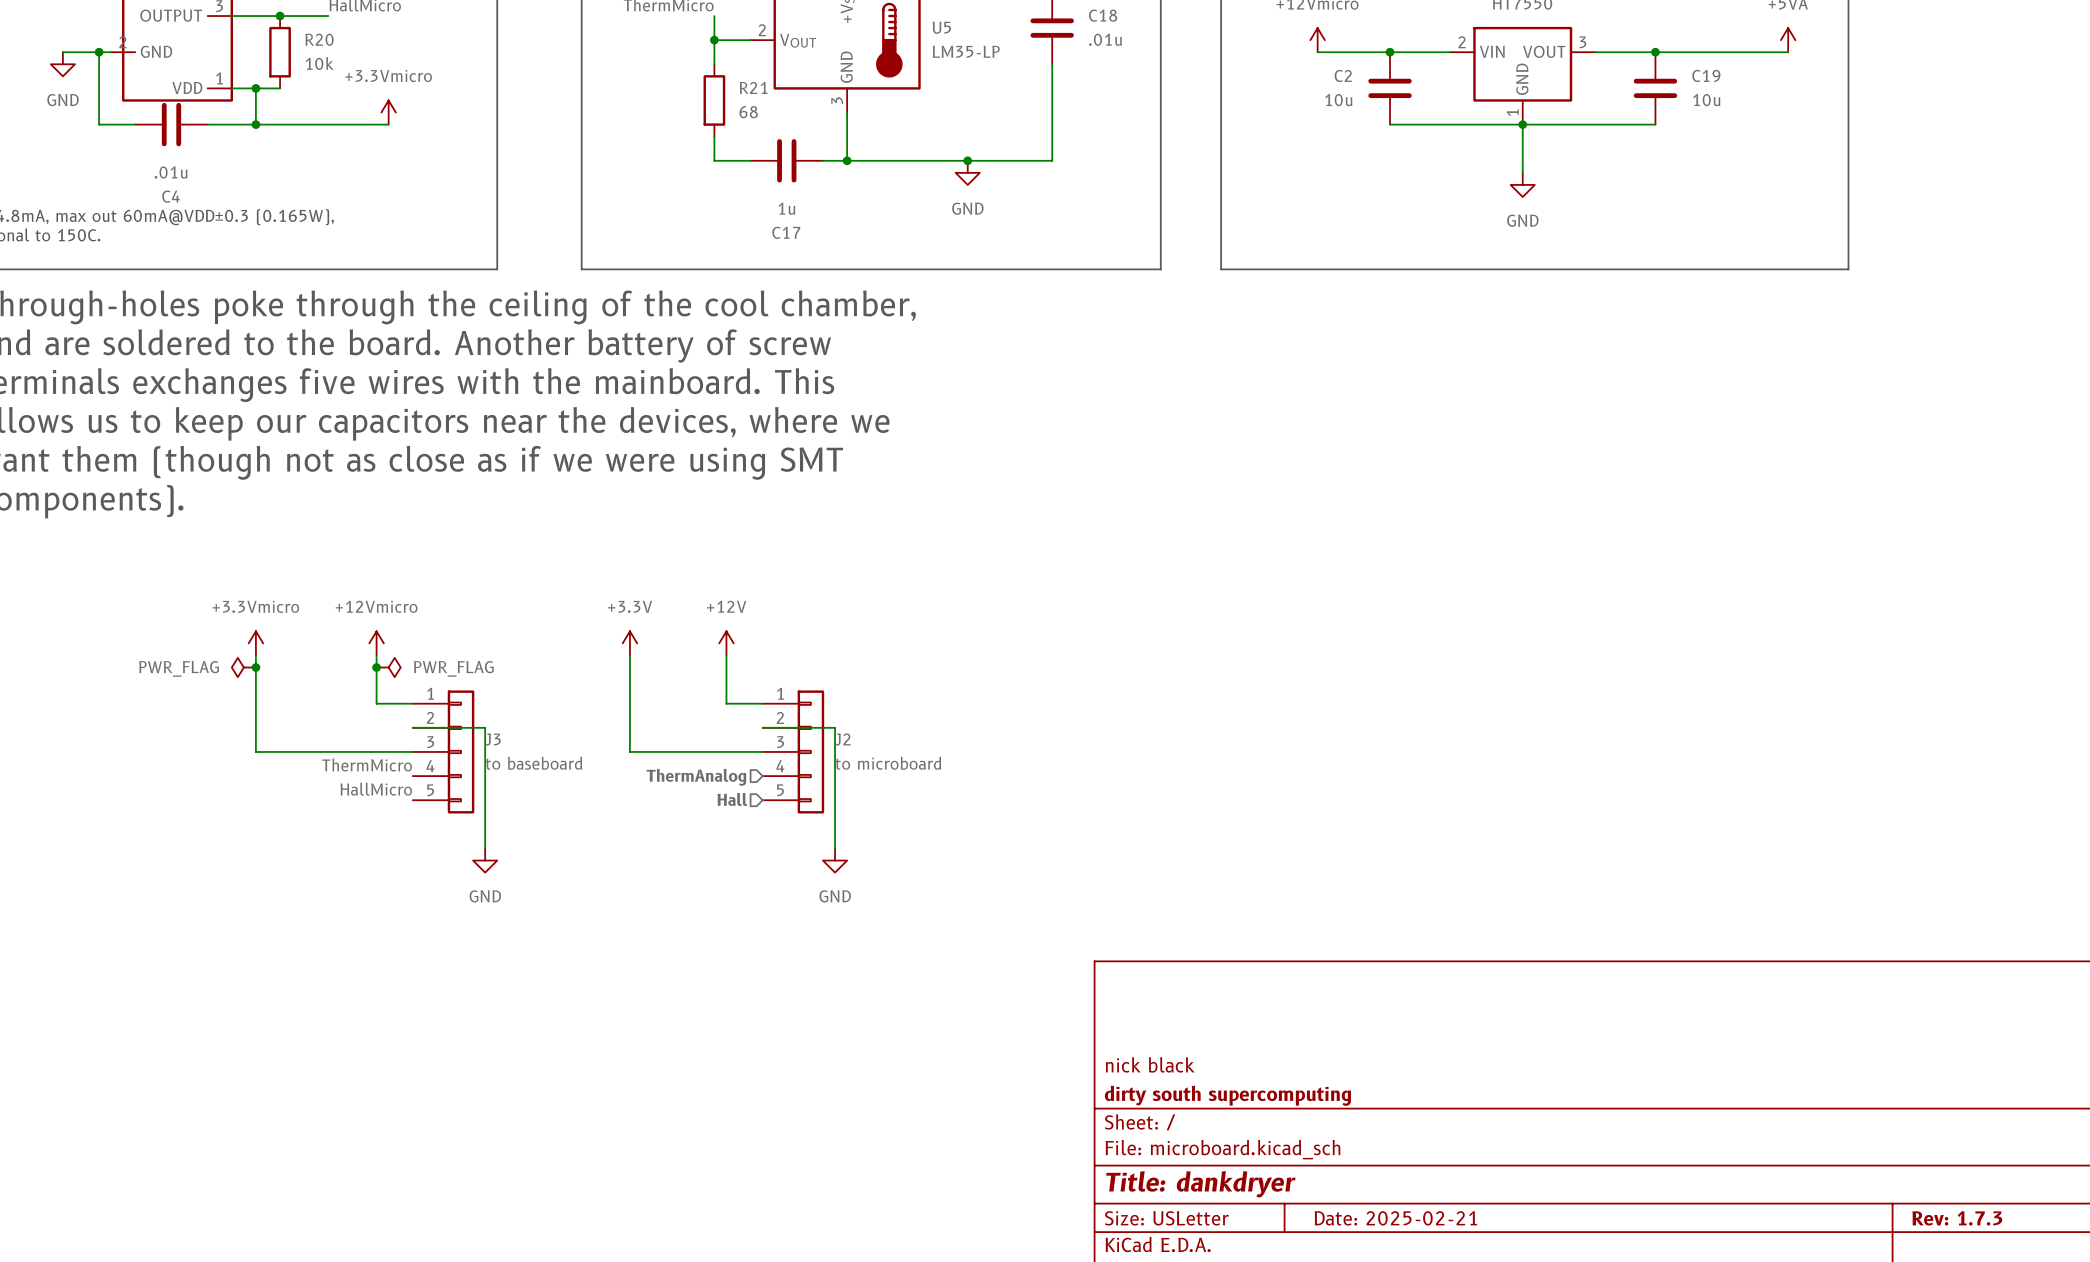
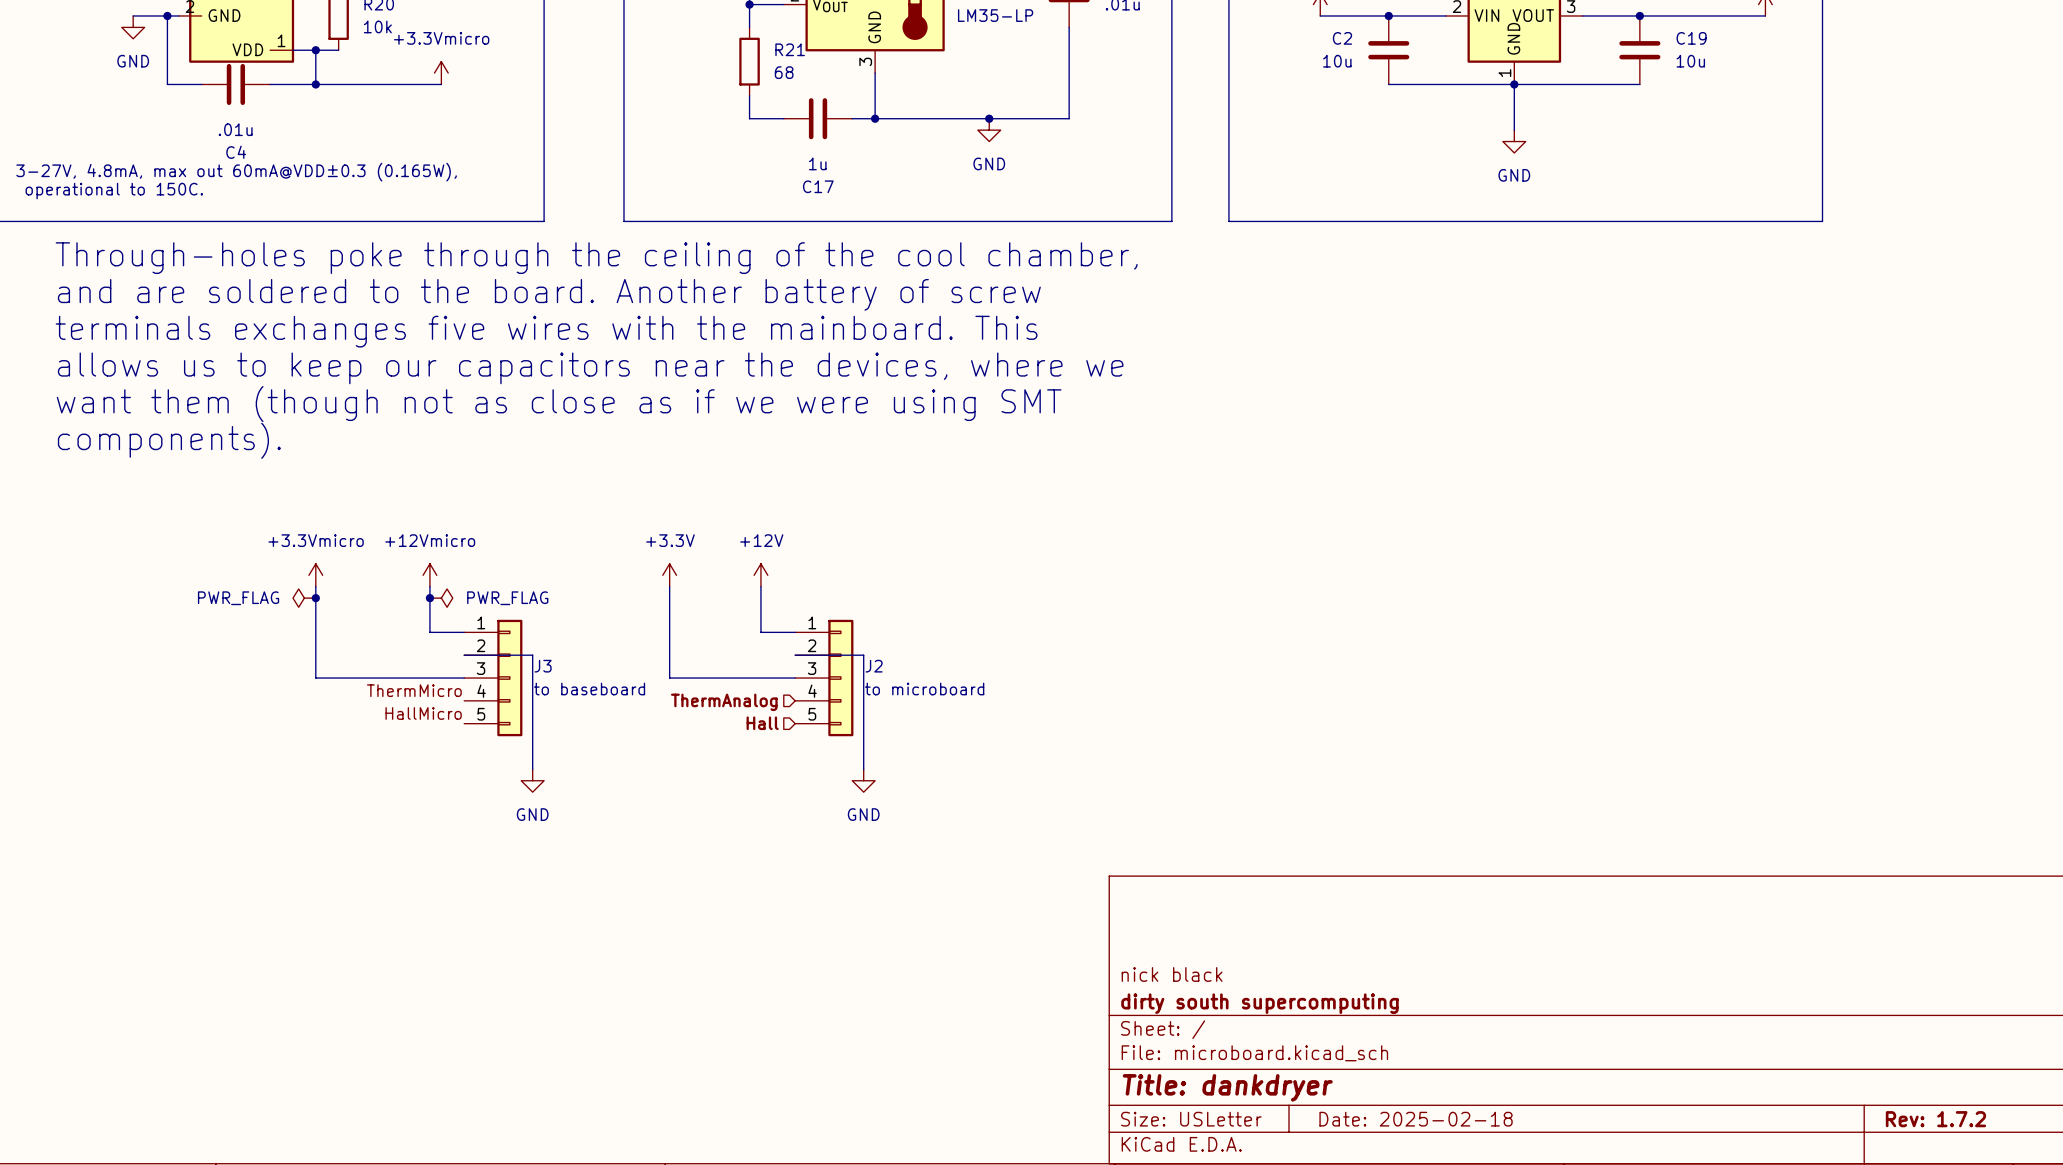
title block: Date: 2025-02-21 (1395, 1218) -> Date: 2025-02-18 (1416, 1119)
title block: Rev: 1.7.3 (1957, 1218) -> Rev: 1.7.2 (1935, 1119)

